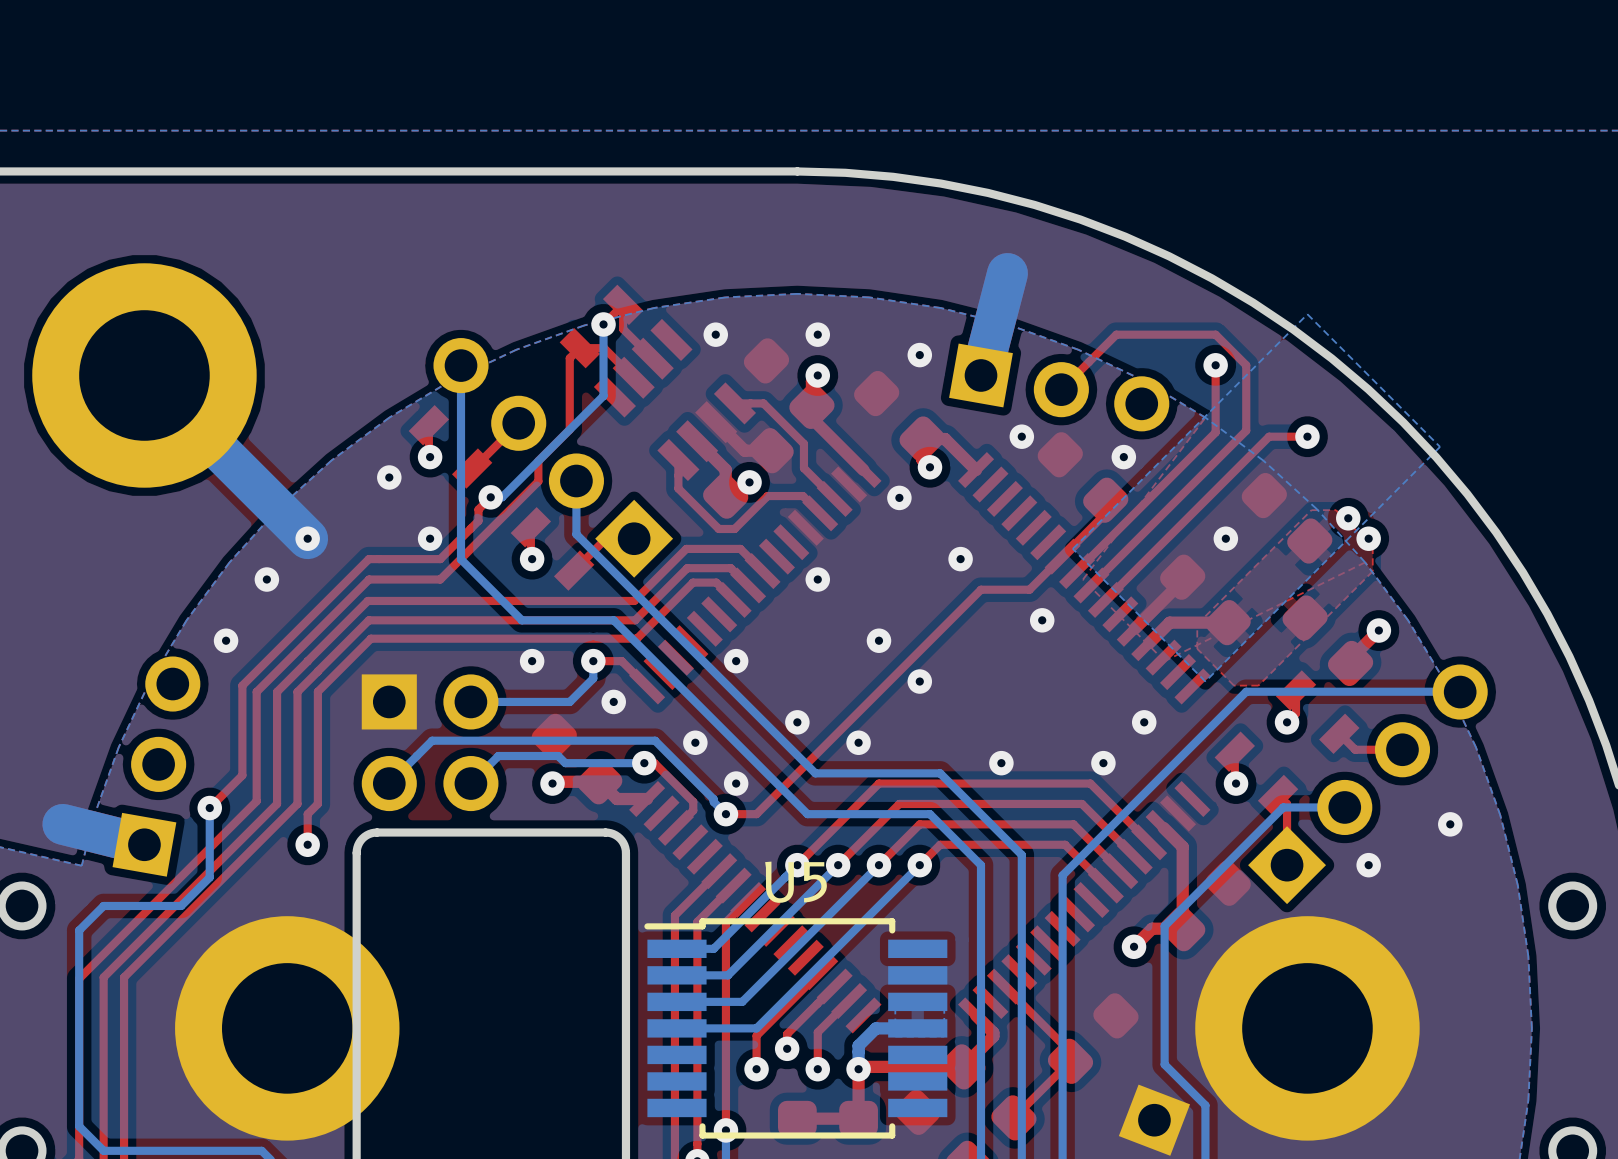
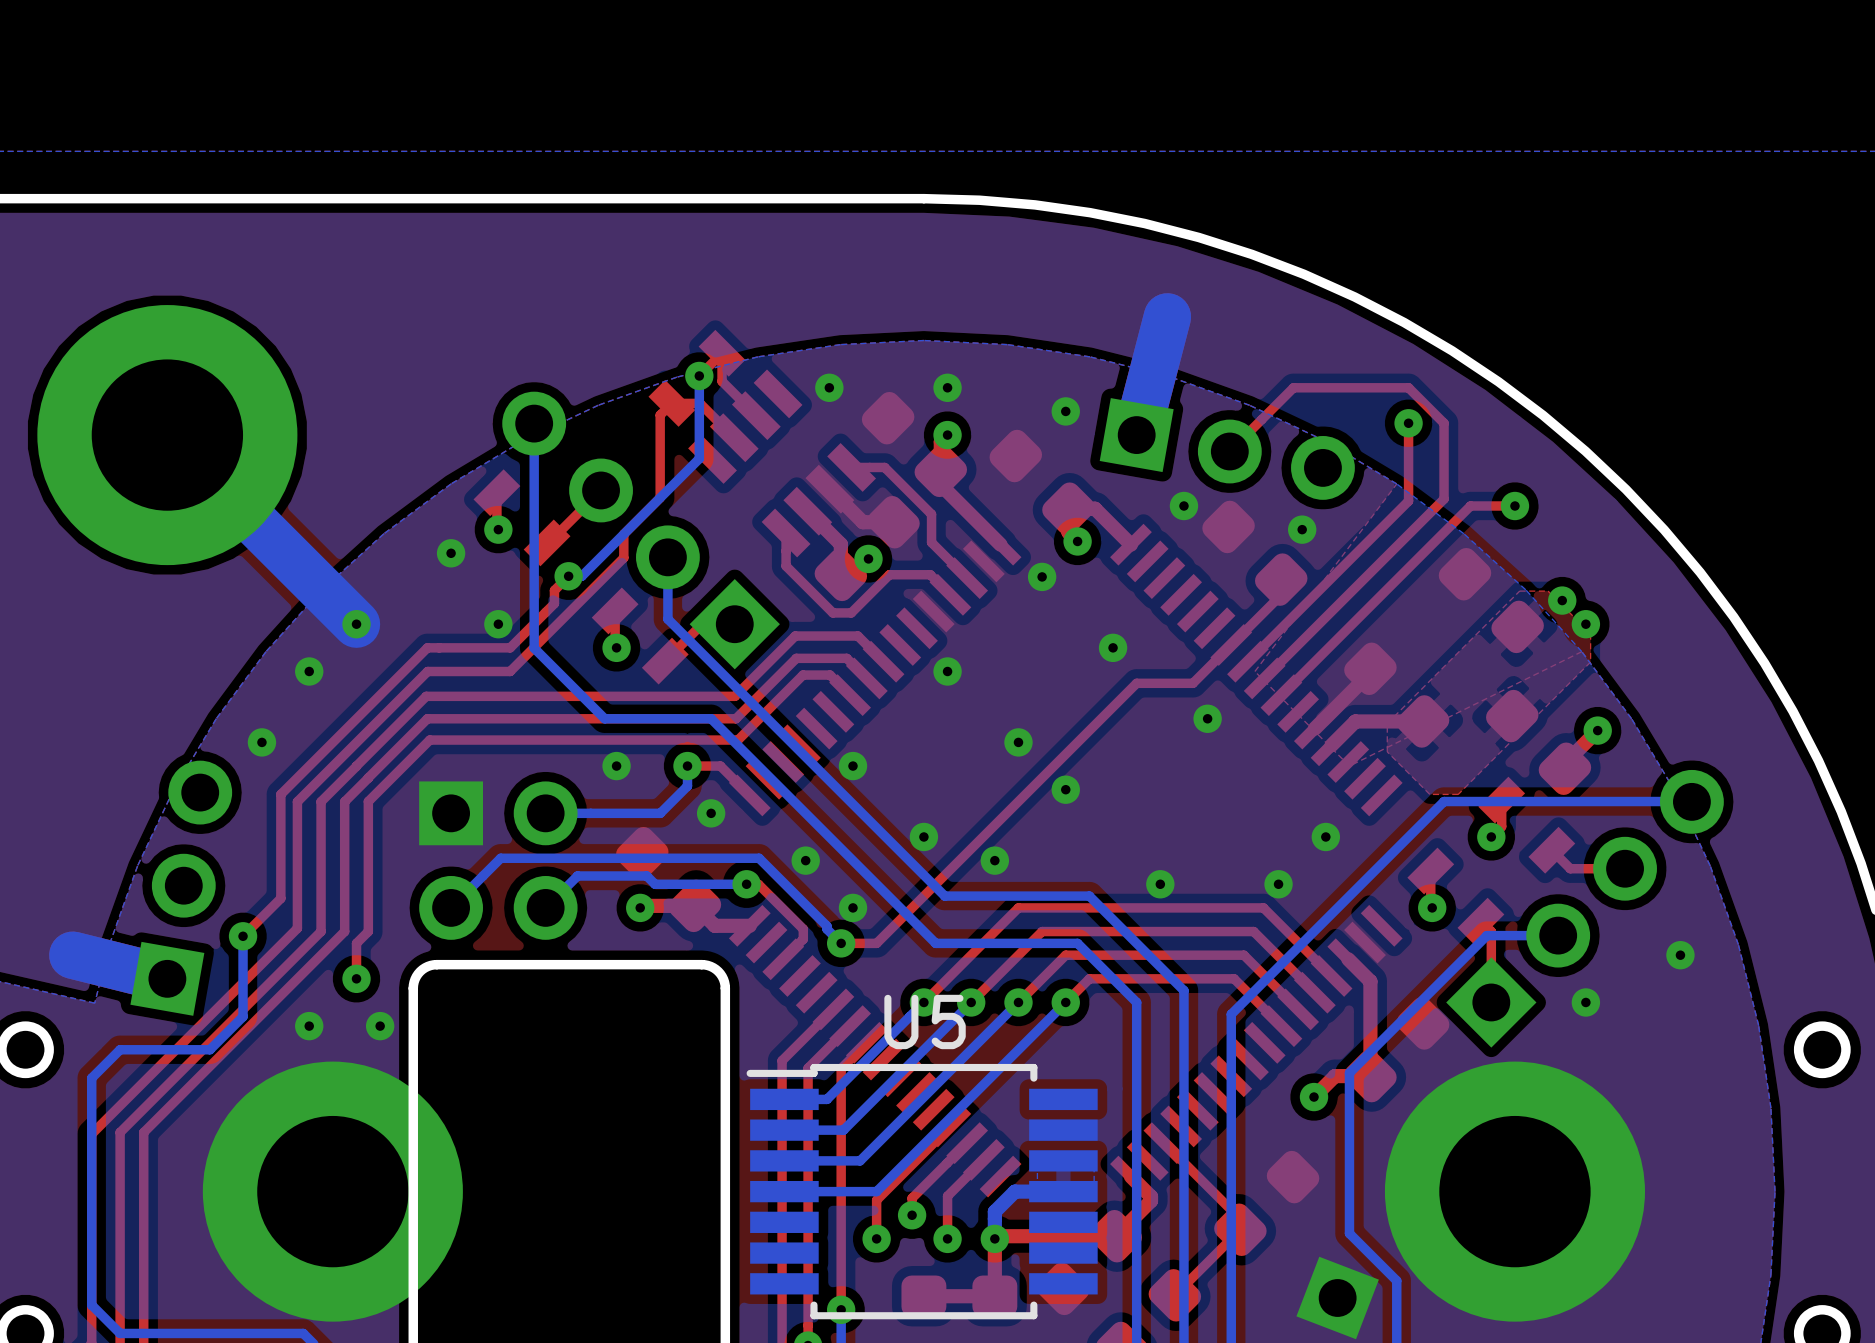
bottom zone outline: (1307, 314) (1072, 548) (1205, 681) (1440, 446) (1307, 314) -> none
via: (1225, 538) -> none
via: none -> (309, 1026)
via: none -> (380, 1026)

